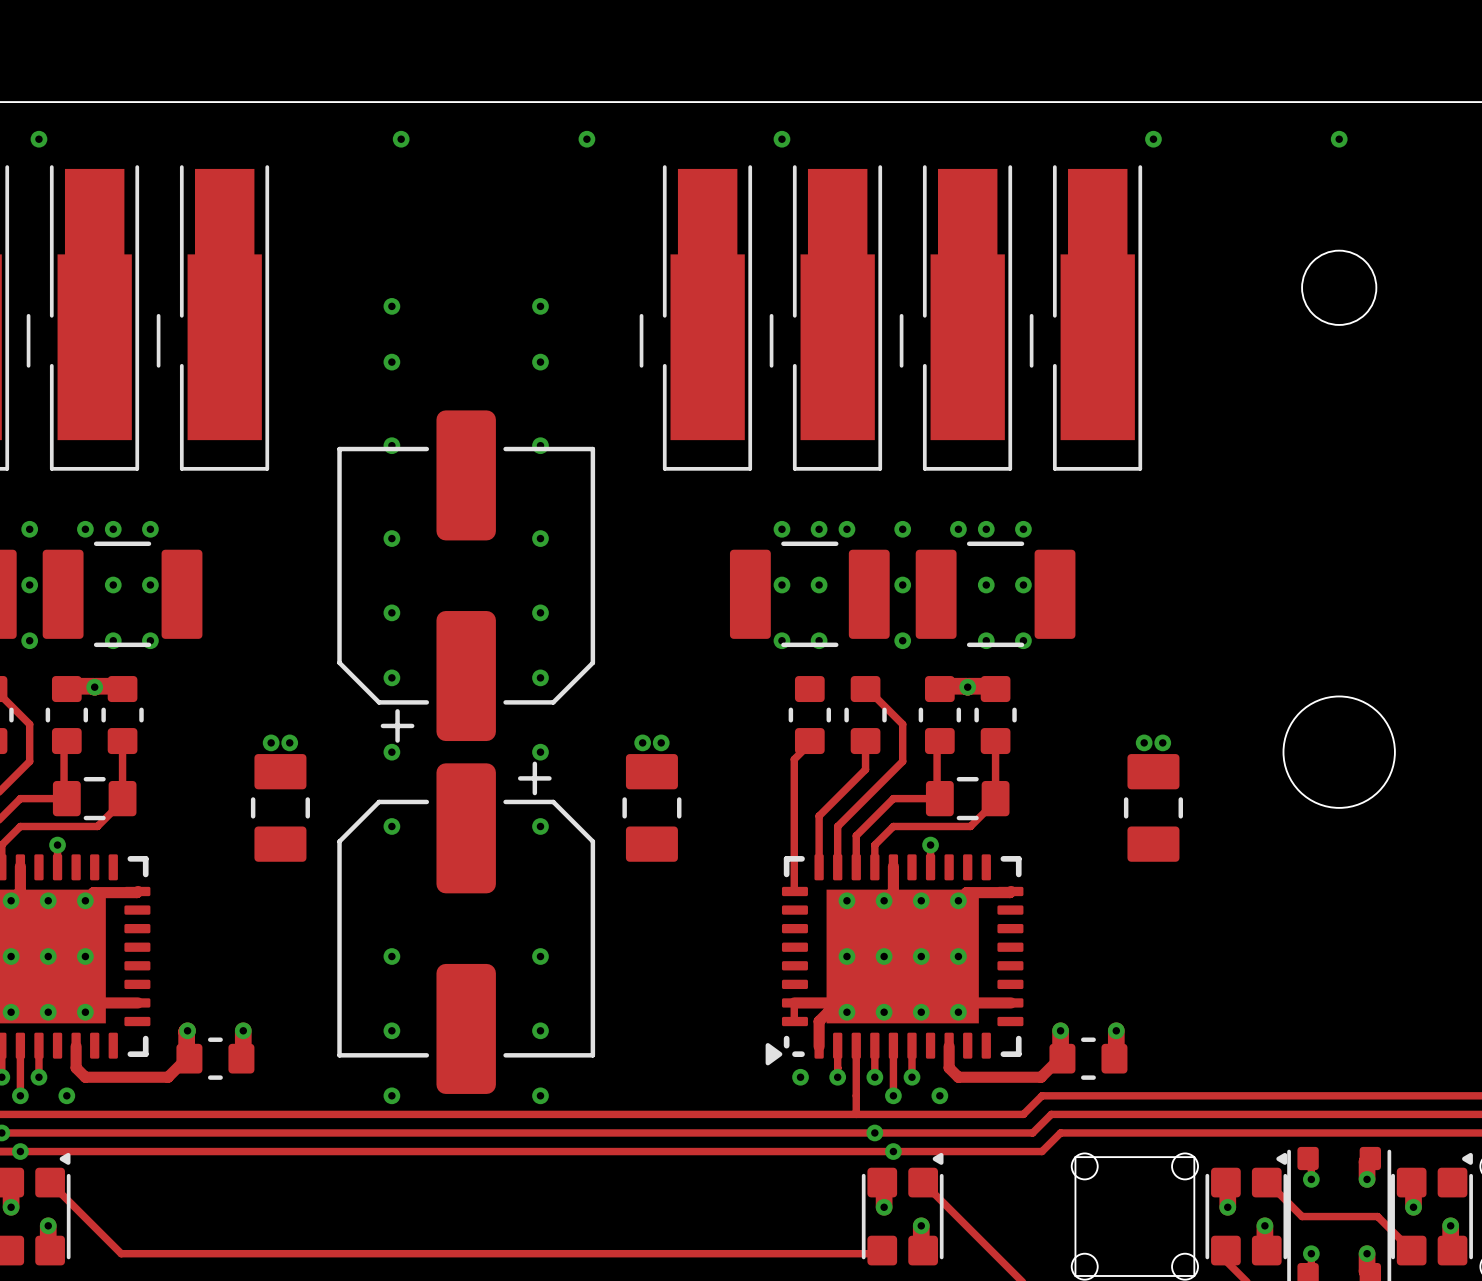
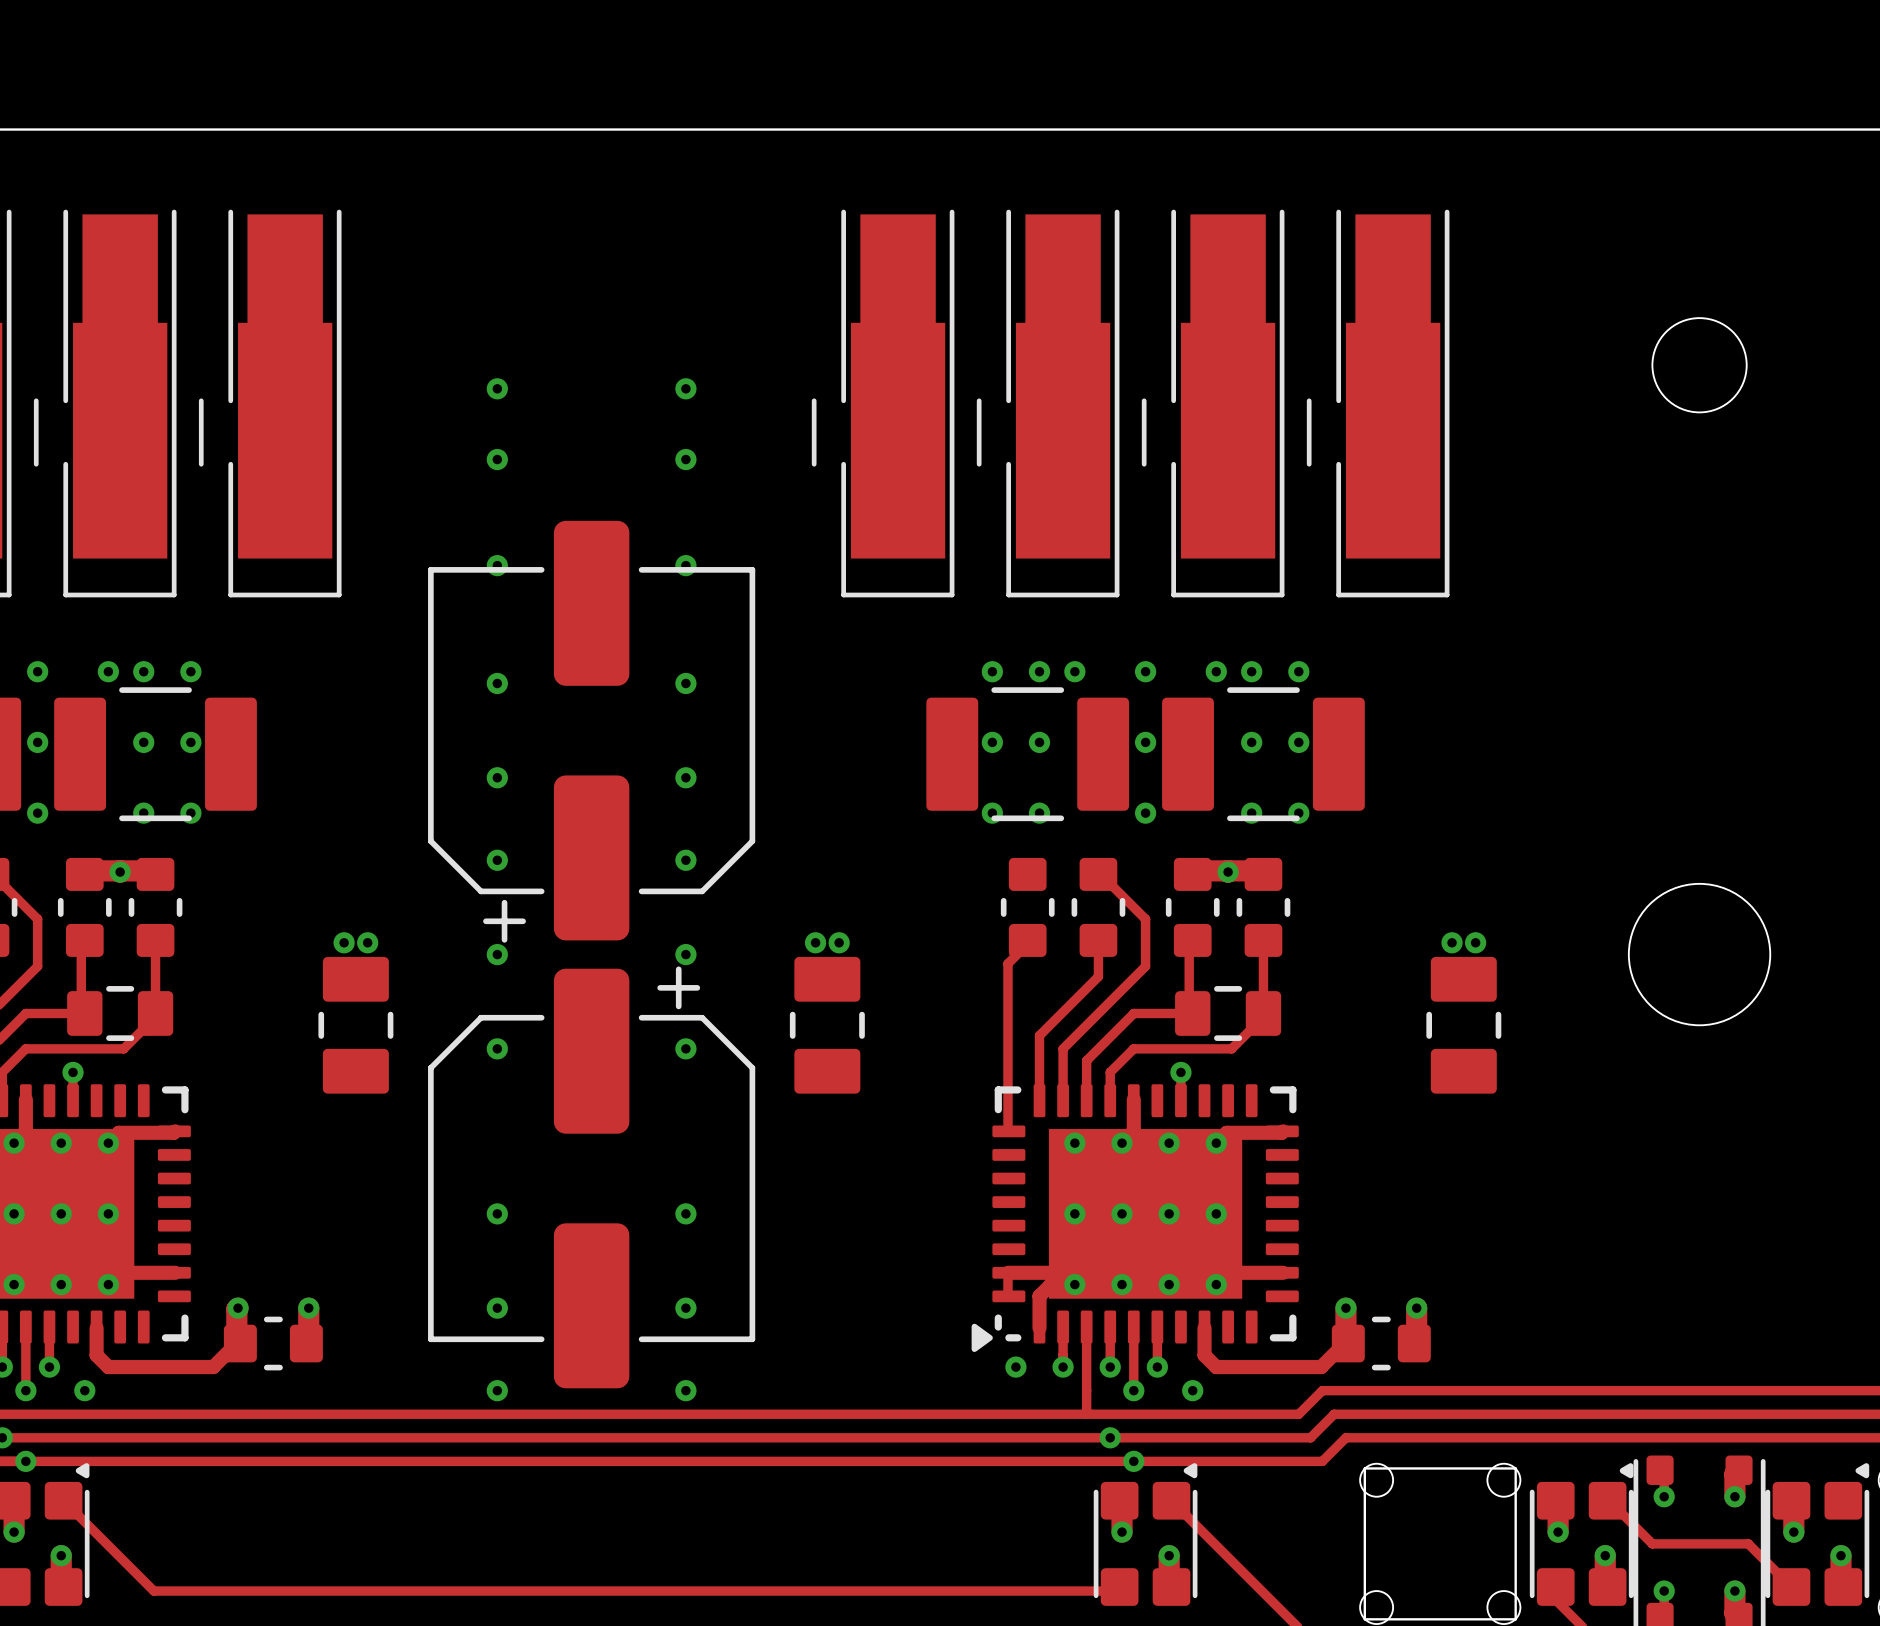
via: (38, 139) -> none
via: (401, 139) -> none
via: (586, 139) -> none
via: (781, 139) -> none
via: (1153, 139) -> none
via: (1339, 139) -> none

